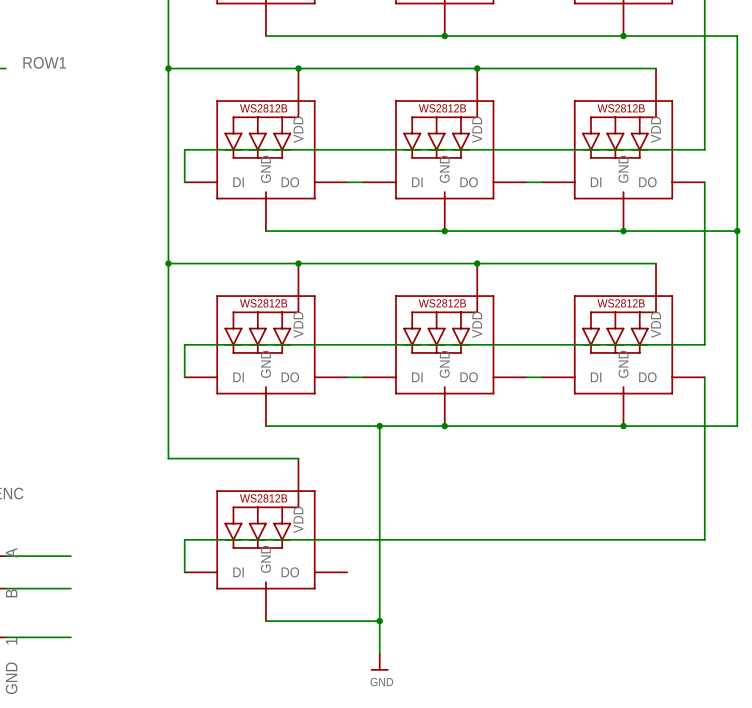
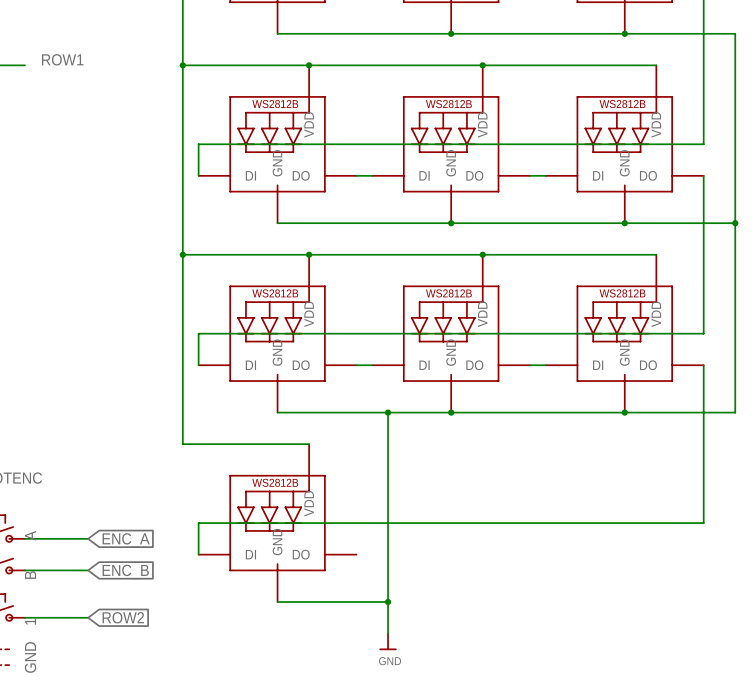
global label: none -> ENC_A (126, 540)
global label: none -> ENC_B (125, 571)
global label: none -> ROW2 (123, 617)

